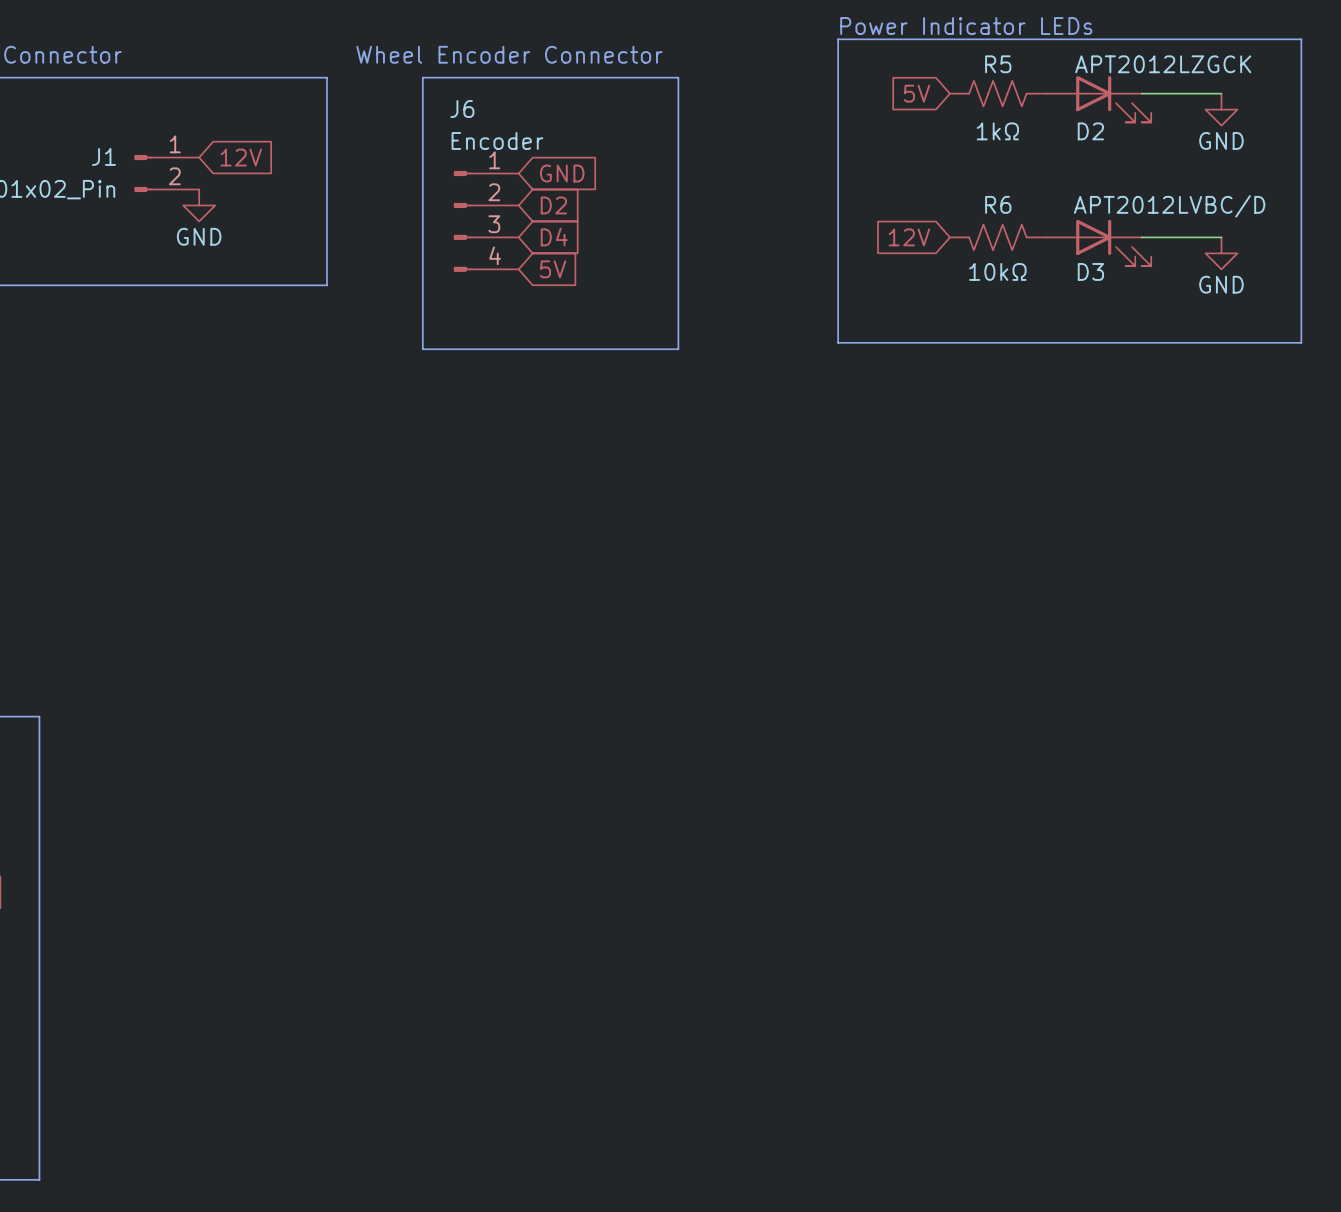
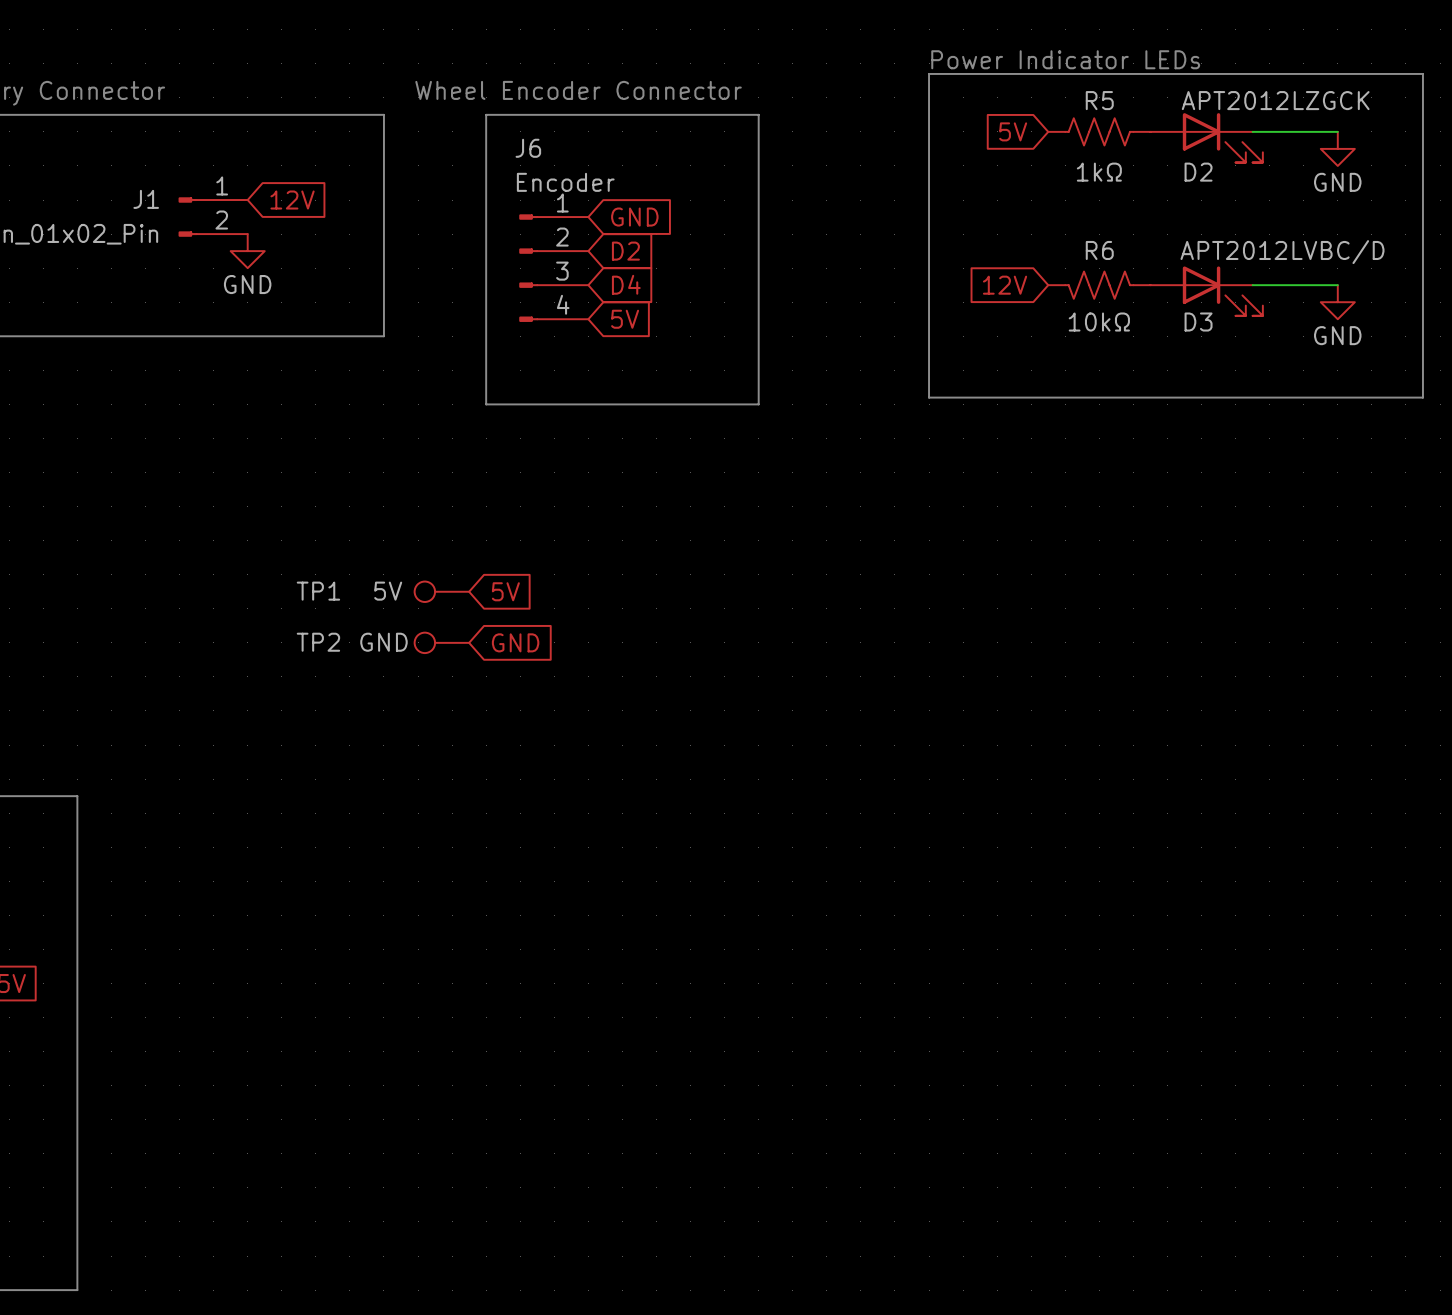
TP1: none -> 5V (441, 591)
global label: none -> 5V (505, 591)
TP2: none -> GND (441, 642)
global label: none -> GND (515, 642)

